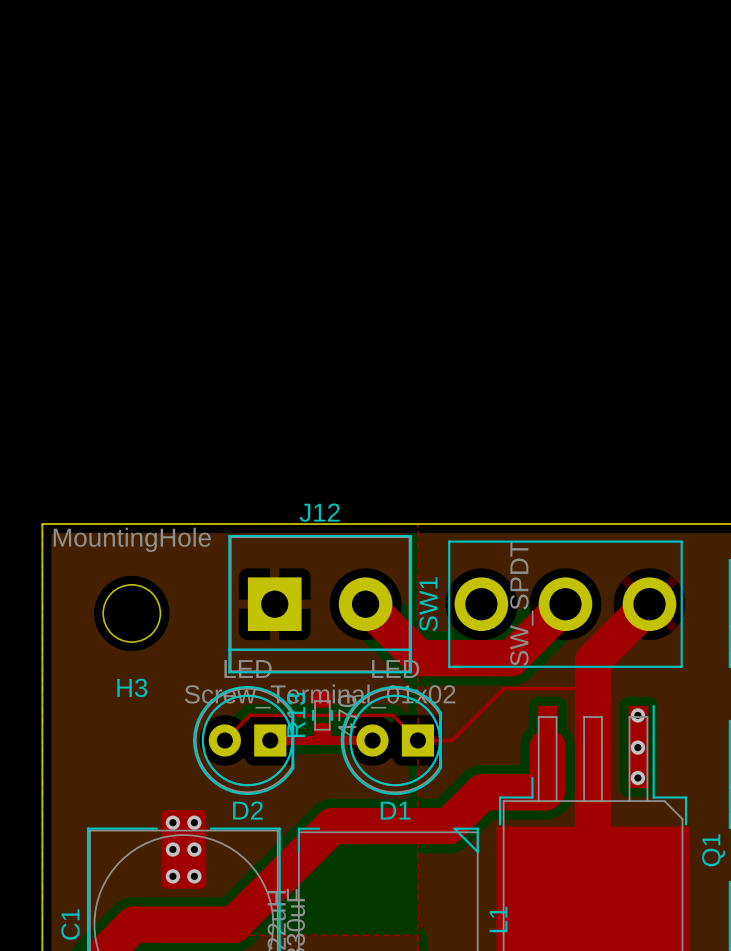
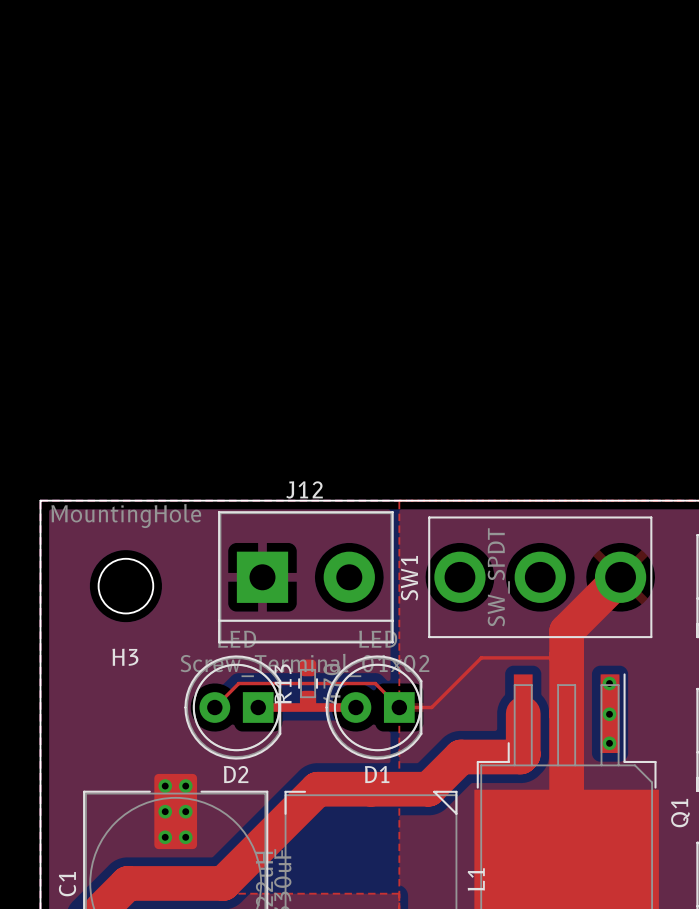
top track: (365, 604) (419, 658) (511, 658) (565, 604) -> none

